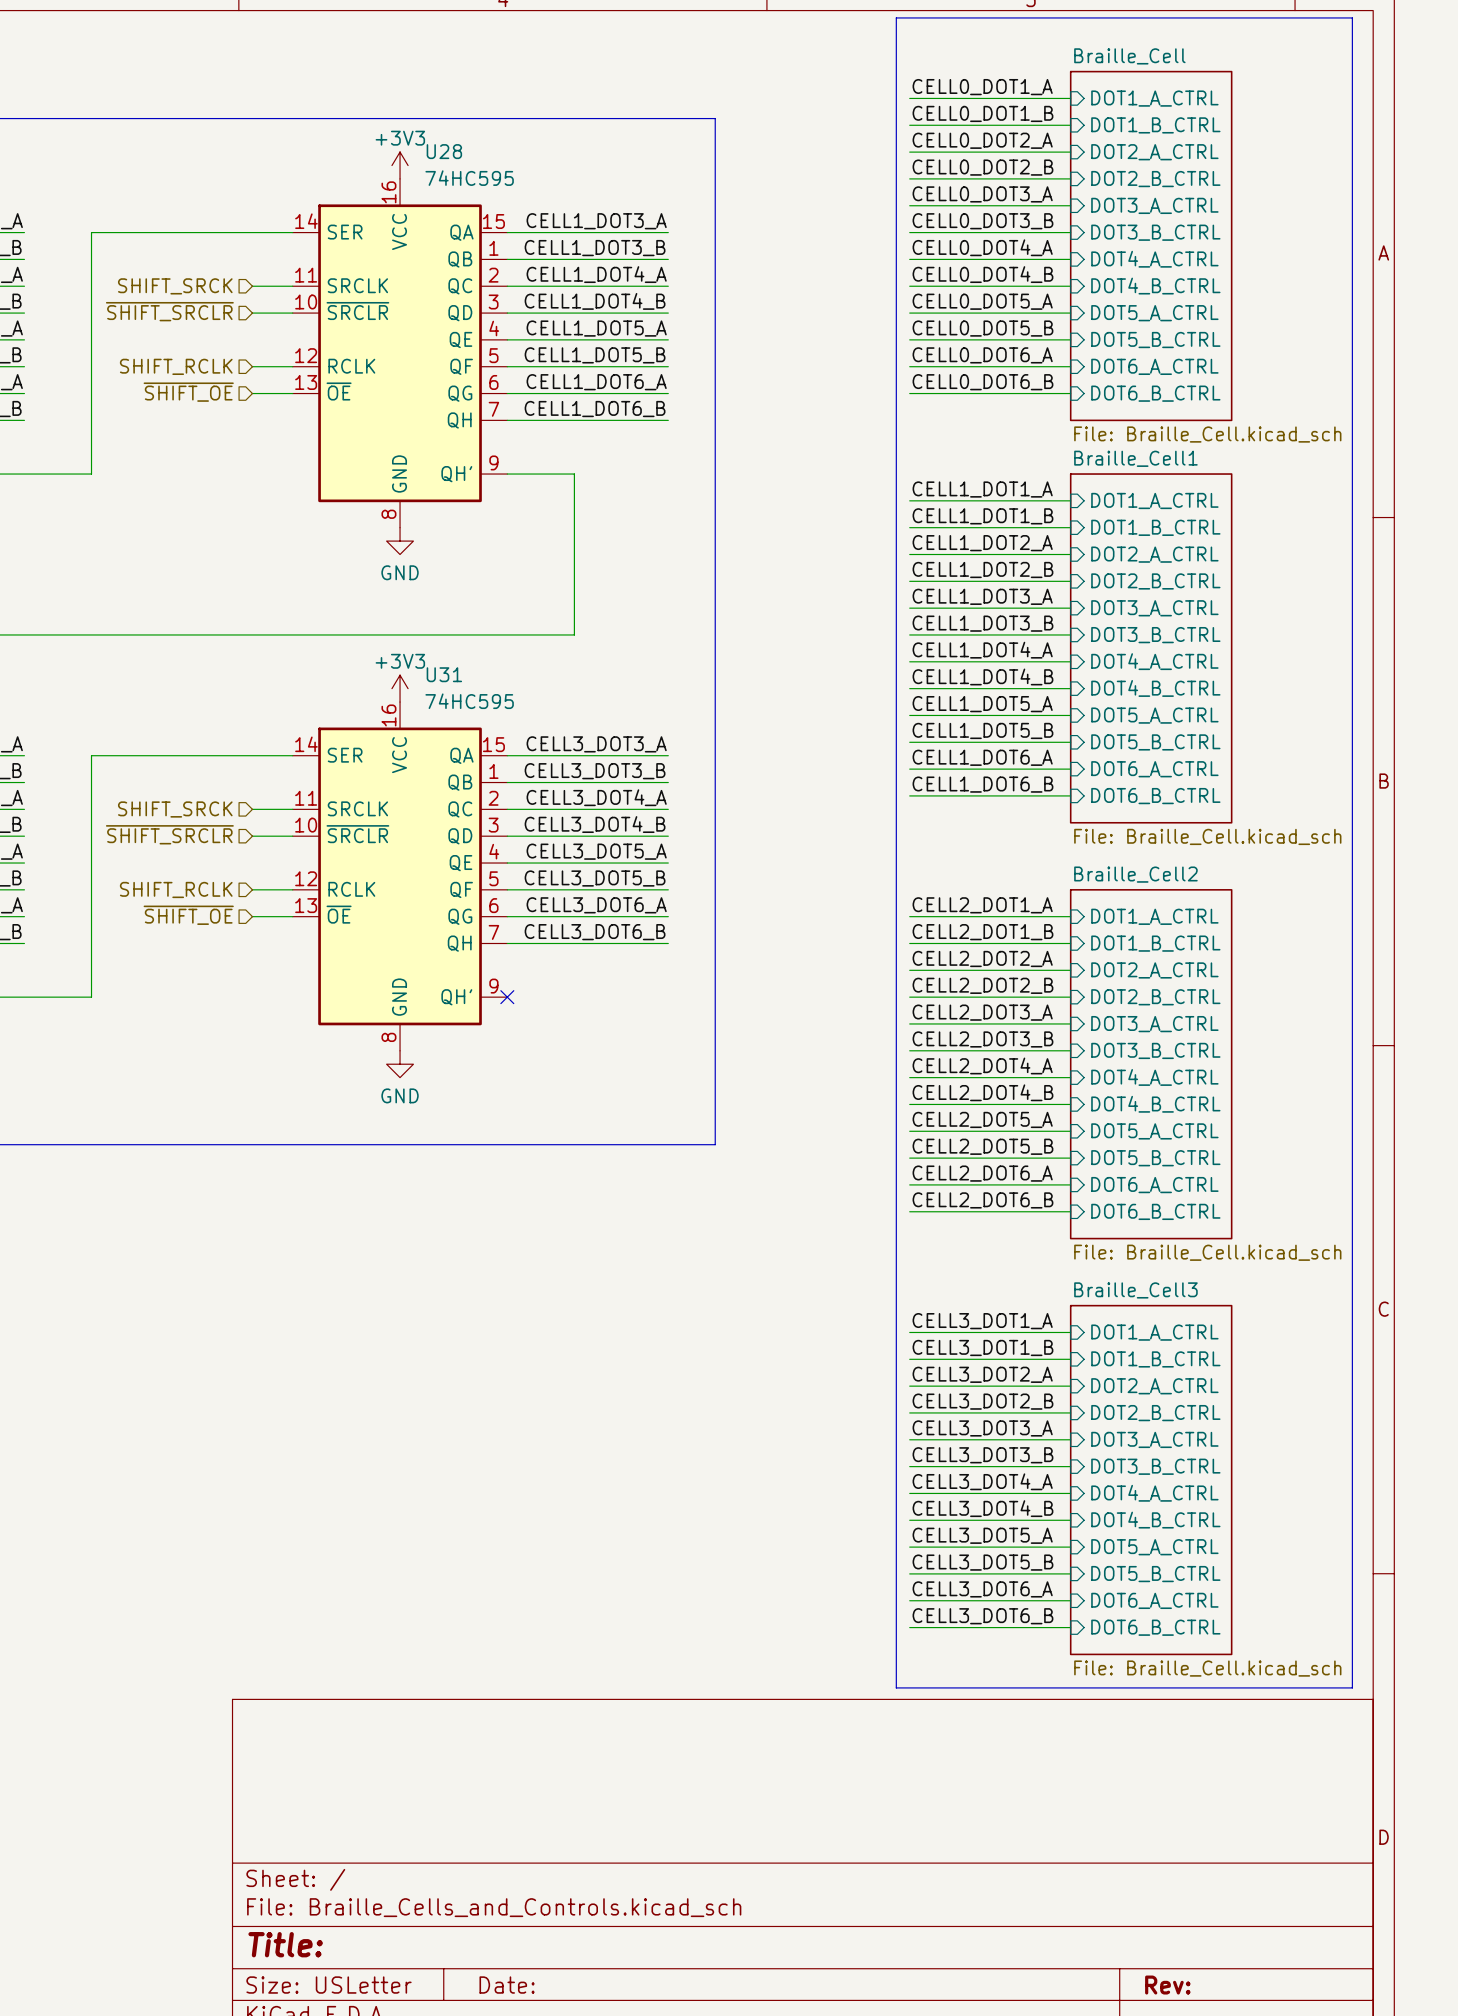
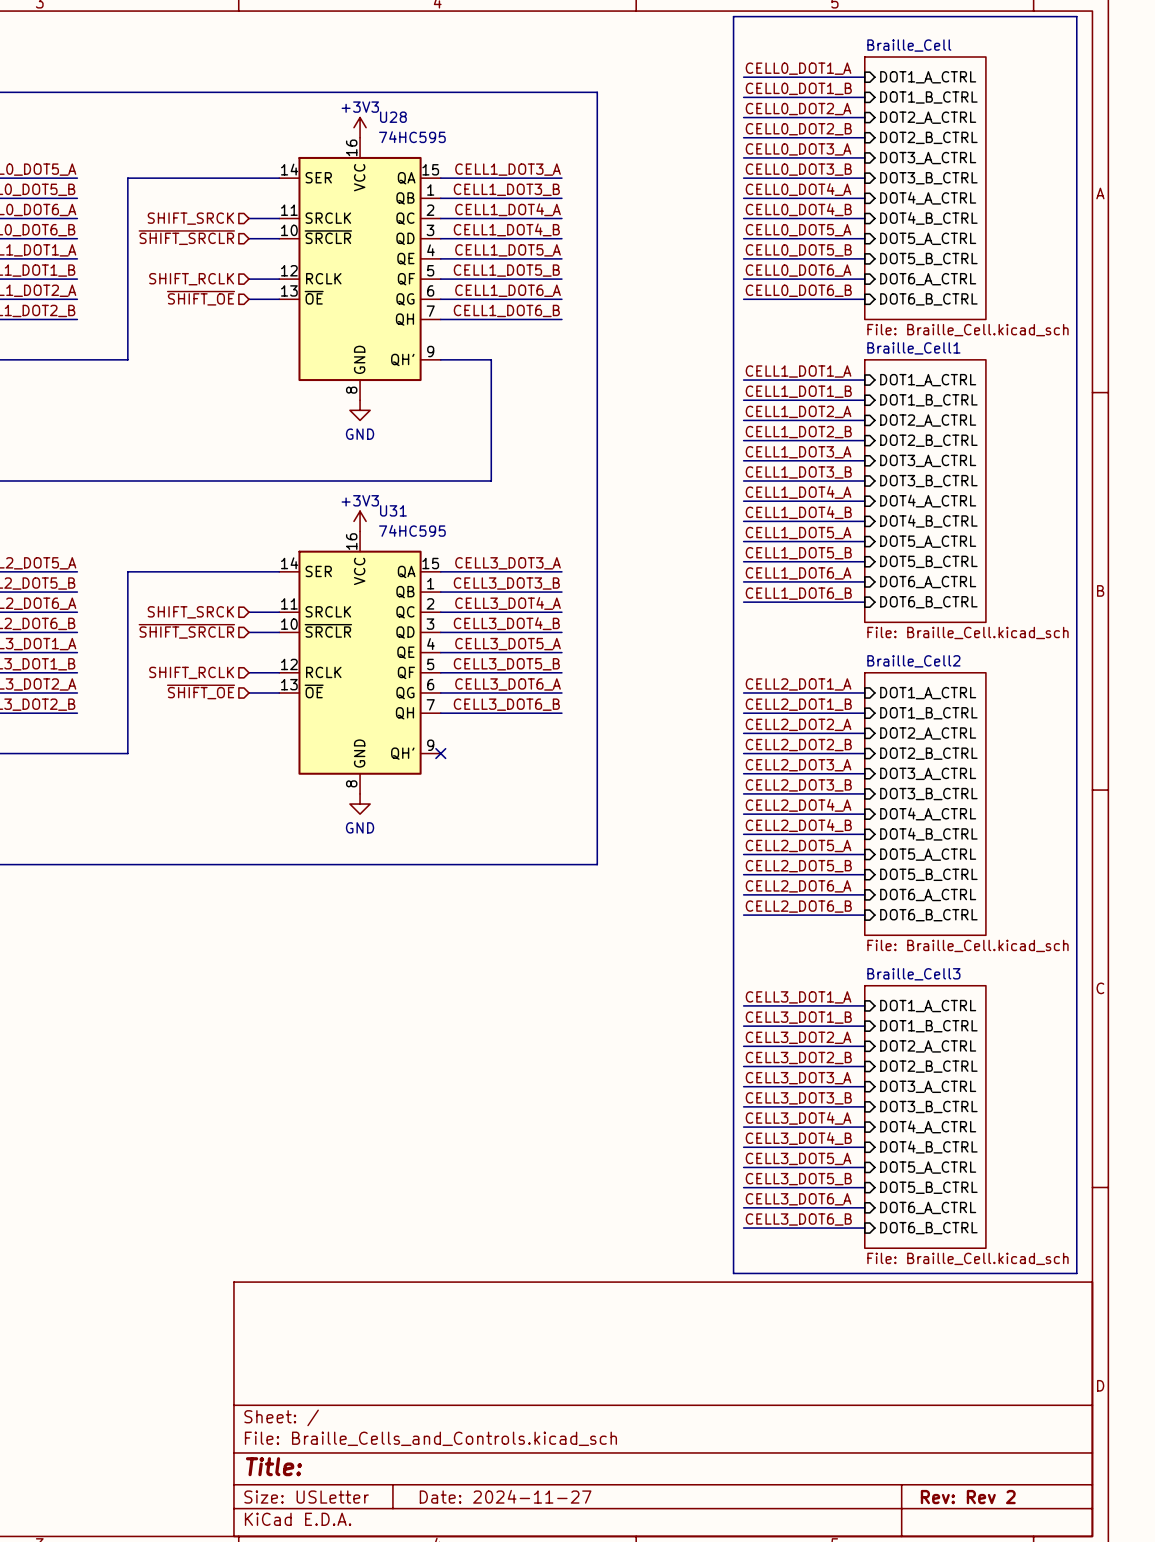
title block: Date: (507, 1985) -> Date: 2024-11-27 (505, 1496)
title block: Rev: (1167, 1985) -> Rev: Rev 2 (968, 1497)

